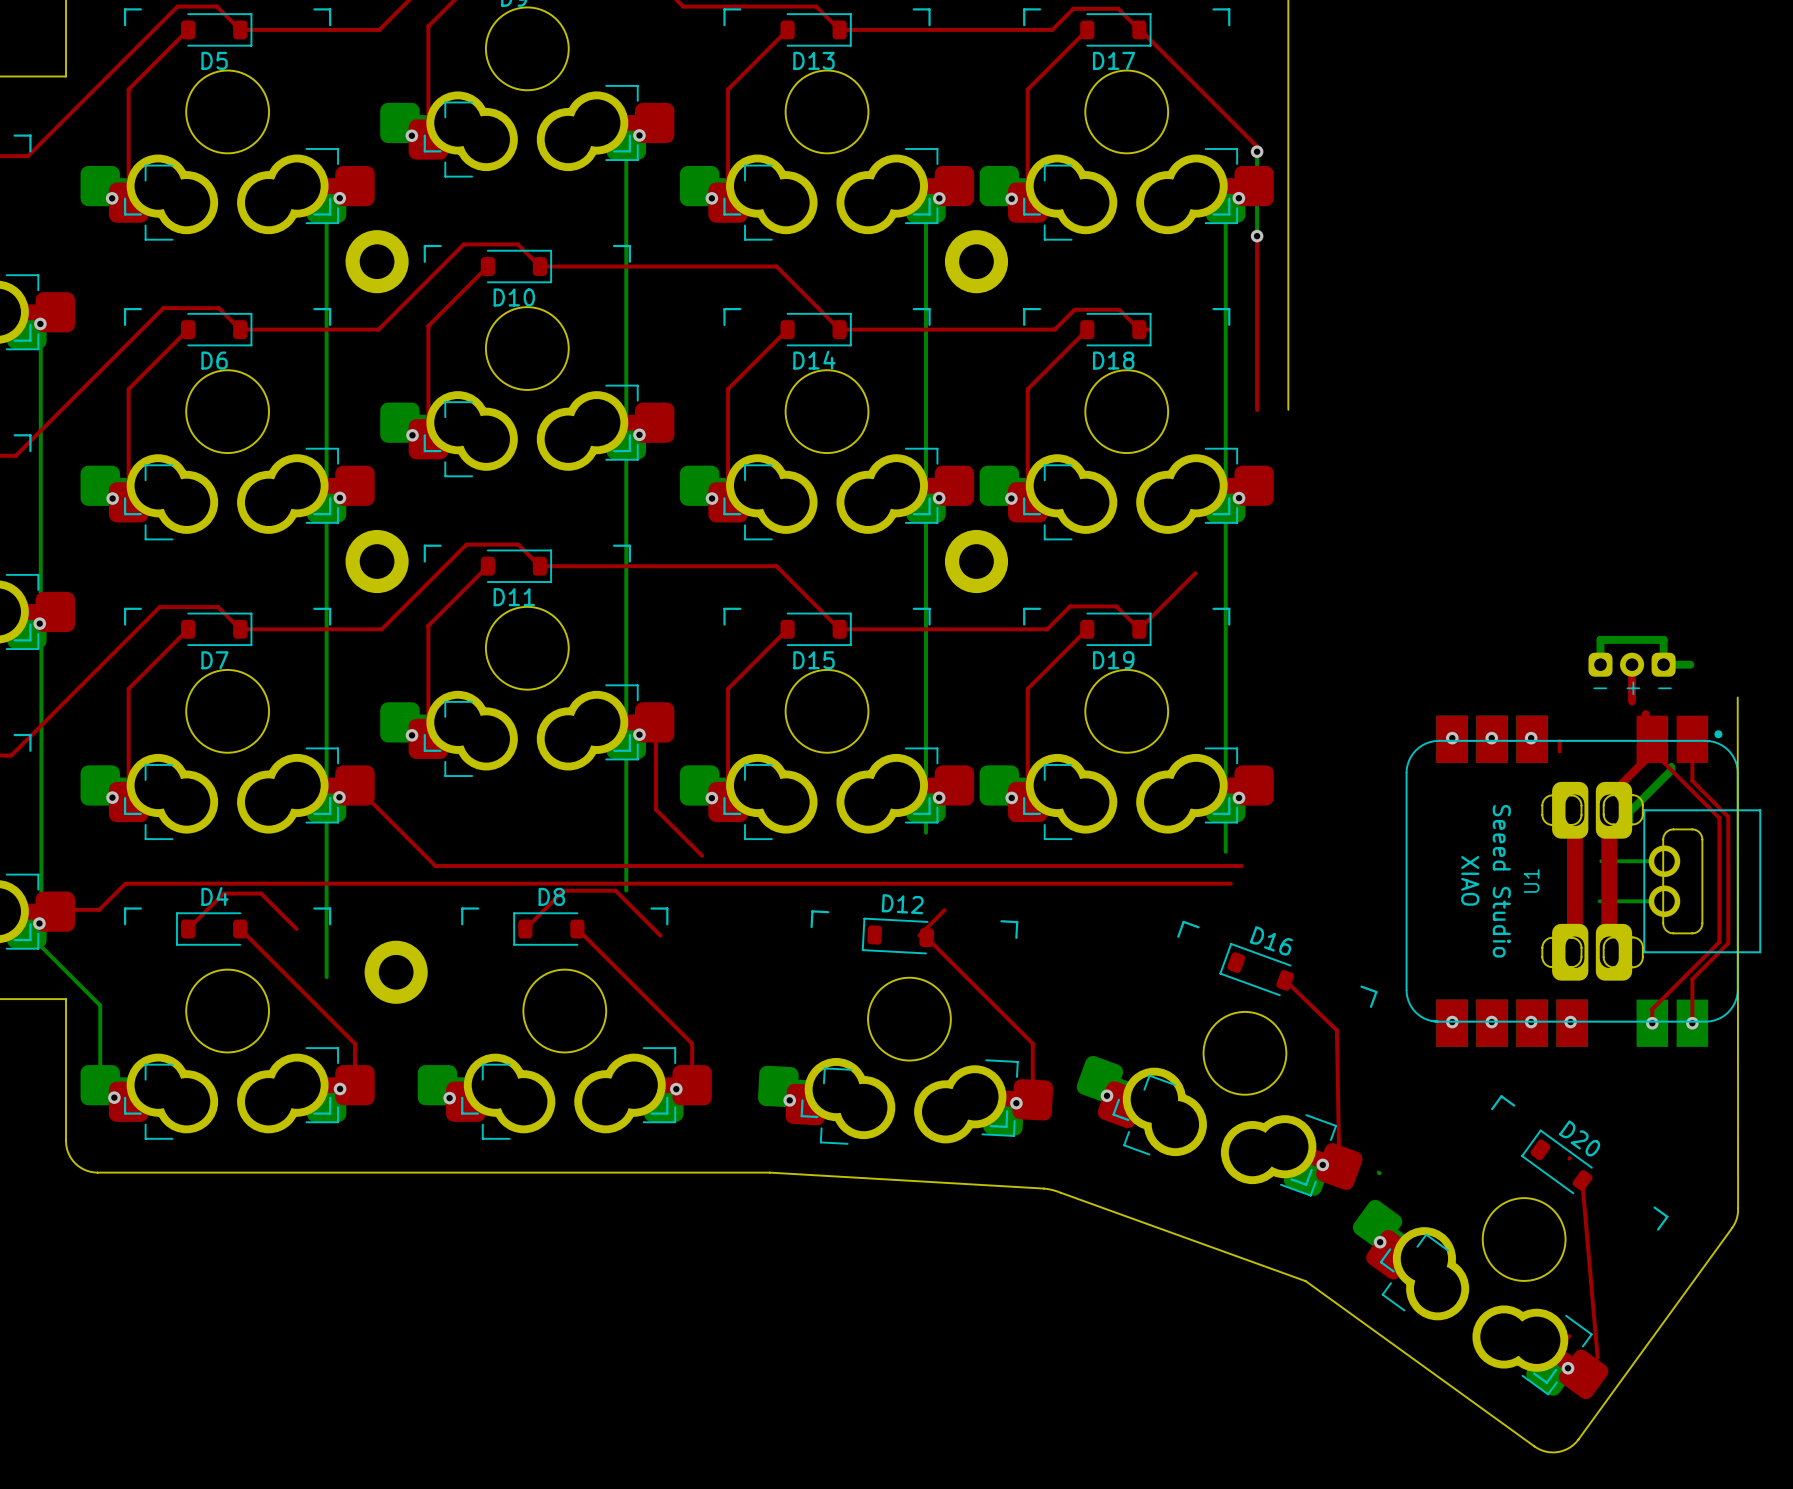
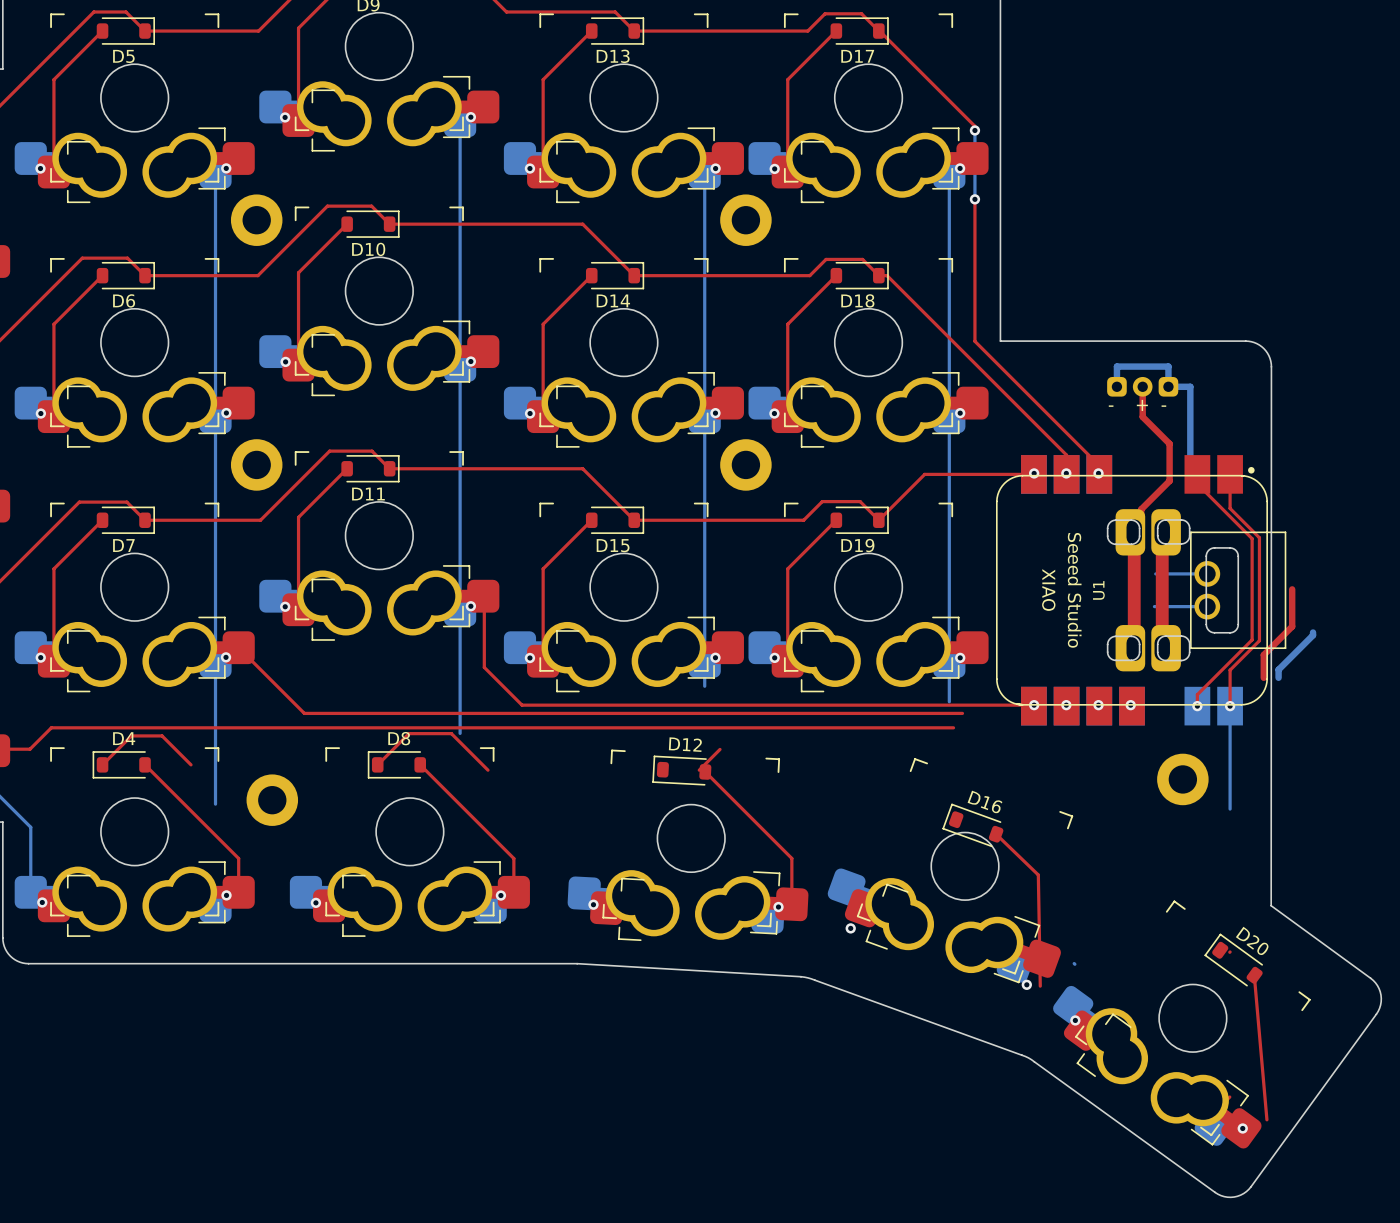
top track: none -> (887, 275) (1066, 455) (1066, 474)
top track: none -> (974, 341) (1099, 465) (1099, 474)
bottom track: none -> (1116, 386) (1116, 366) (1168, 366) (1168, 386) (1190, 386) (1190, 486)
top track: none -> (1142, 386) (1142, 416) (1169, 443) (1169, 481) (1141, 509) (1141, 532)
via: none -> (1034, 473)
via: none -> (1066, 473)
via: none -> (1098, 473)
top track: none -> (924, 474) (1033, 474)
bottom track: (1600, 664) (1600, 639) (1663, 639) (1663, 664) (1690, 664) -> none
top track: (1632, 664) (1632, 701) -> none
part position: (1632, 664) -> (1142, 386)
board edge: (1737, 697) (1737, 1215) (1732, 1228) (1572, 1445) (1557, 1452) (1549, 1452) (1537, 1448) (1305, 1281) (1060, 1192) -> (1000, 341) (1245, 341) (1256, 343) (1267, 353) (1271, 366) (1271, 905) (1373, 980) (1380, 991) (1380, 1005) (1376, 1014) (1251, 1186) (1240, 1195) (1227, 1197) (1215, 1192) (1028, 1057) (814, 980)
via: (1452, 738) -> none
via: (1491, 738) -> none
via: (1531, 738) -> none
top track: (1652, 739) (1652, 751) (1719, 818) (1719, 942) (1652, 1009) (1652, 1023) -> (1197, 474) (1197, 483) (1252, 538) (1252, 639) (1197, 694) (1197, 706)
top track: (1692, 739) (1692, 781) (1728, 816) (1728, 943) (1692, 979) (1692, 1023) -> (1230, 474) (1230, 508) (1259, 537) (1259, 640) (1230, 670) (1230, 706)
top track: (1559, 740) (1559, 751) -> none
top track: (1574, 810) (1574, 952) -> (1134, 532) (1134, 648)
top track: (1609, 810) (1609, 952) -> (1162, 532) (1162, 648)
top track: none -> (522, 705) (1034, 705)
via: none -> (1034, 705)
via: none -> (1066, 705)
via: none -> (1098, 705)
via: none -> (1130, 705)
via: none -> (1197, 706)
bottom track: none -> (1230, 706) (1230, 809)
via: none -> (1230, 706)
bottom track: (1601, 861) (1664, 861) -> (1155, 573) (1207, 573)
U1 position: (1583, 881) -> (1141, 590)
bottom track: (1599, 901) (1664, 901) -> (1154, 606) (1207, 606)
part: none -> (1182, 779)
D16 position: (1256, 969) -> (972, 825)
top track: (1285, 980) (1336, 1030) (1339, 1166) -> (996, 834) (1038, 874) (1040, 986)
via: (1452, 1022) -> none
via: (1491, 1022) -> none
via: (1531, 1022) -> none
via: (1570, 1022) -> none
via: (1652, 1023) -> none
via: (1692, 1023) -> none
via position: (1107, 1095) -> (850, 928)
D20 position: (1556, 1161) -> (1233, 960)
via position: (1322, 1164) -> (1026, 984)
top track: (1582, 1180) (1597, 1357) -> (1254, 975) (1266, 1119)
via position: (1568, 1368) -> (1242, 1128)

